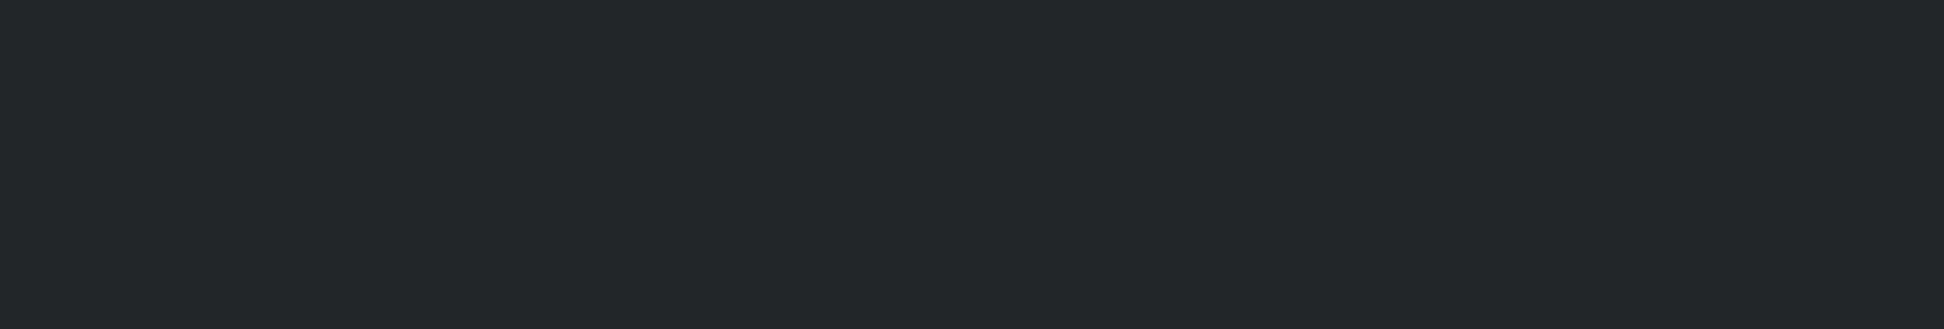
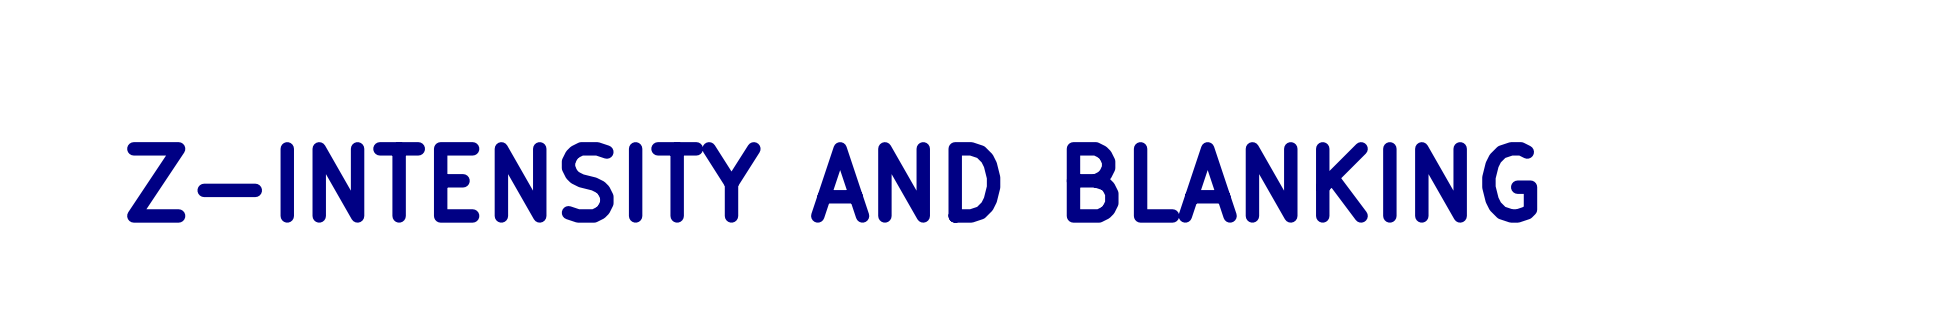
text: none -> Z-INTENSITY AND BLANKING (832, 182)

